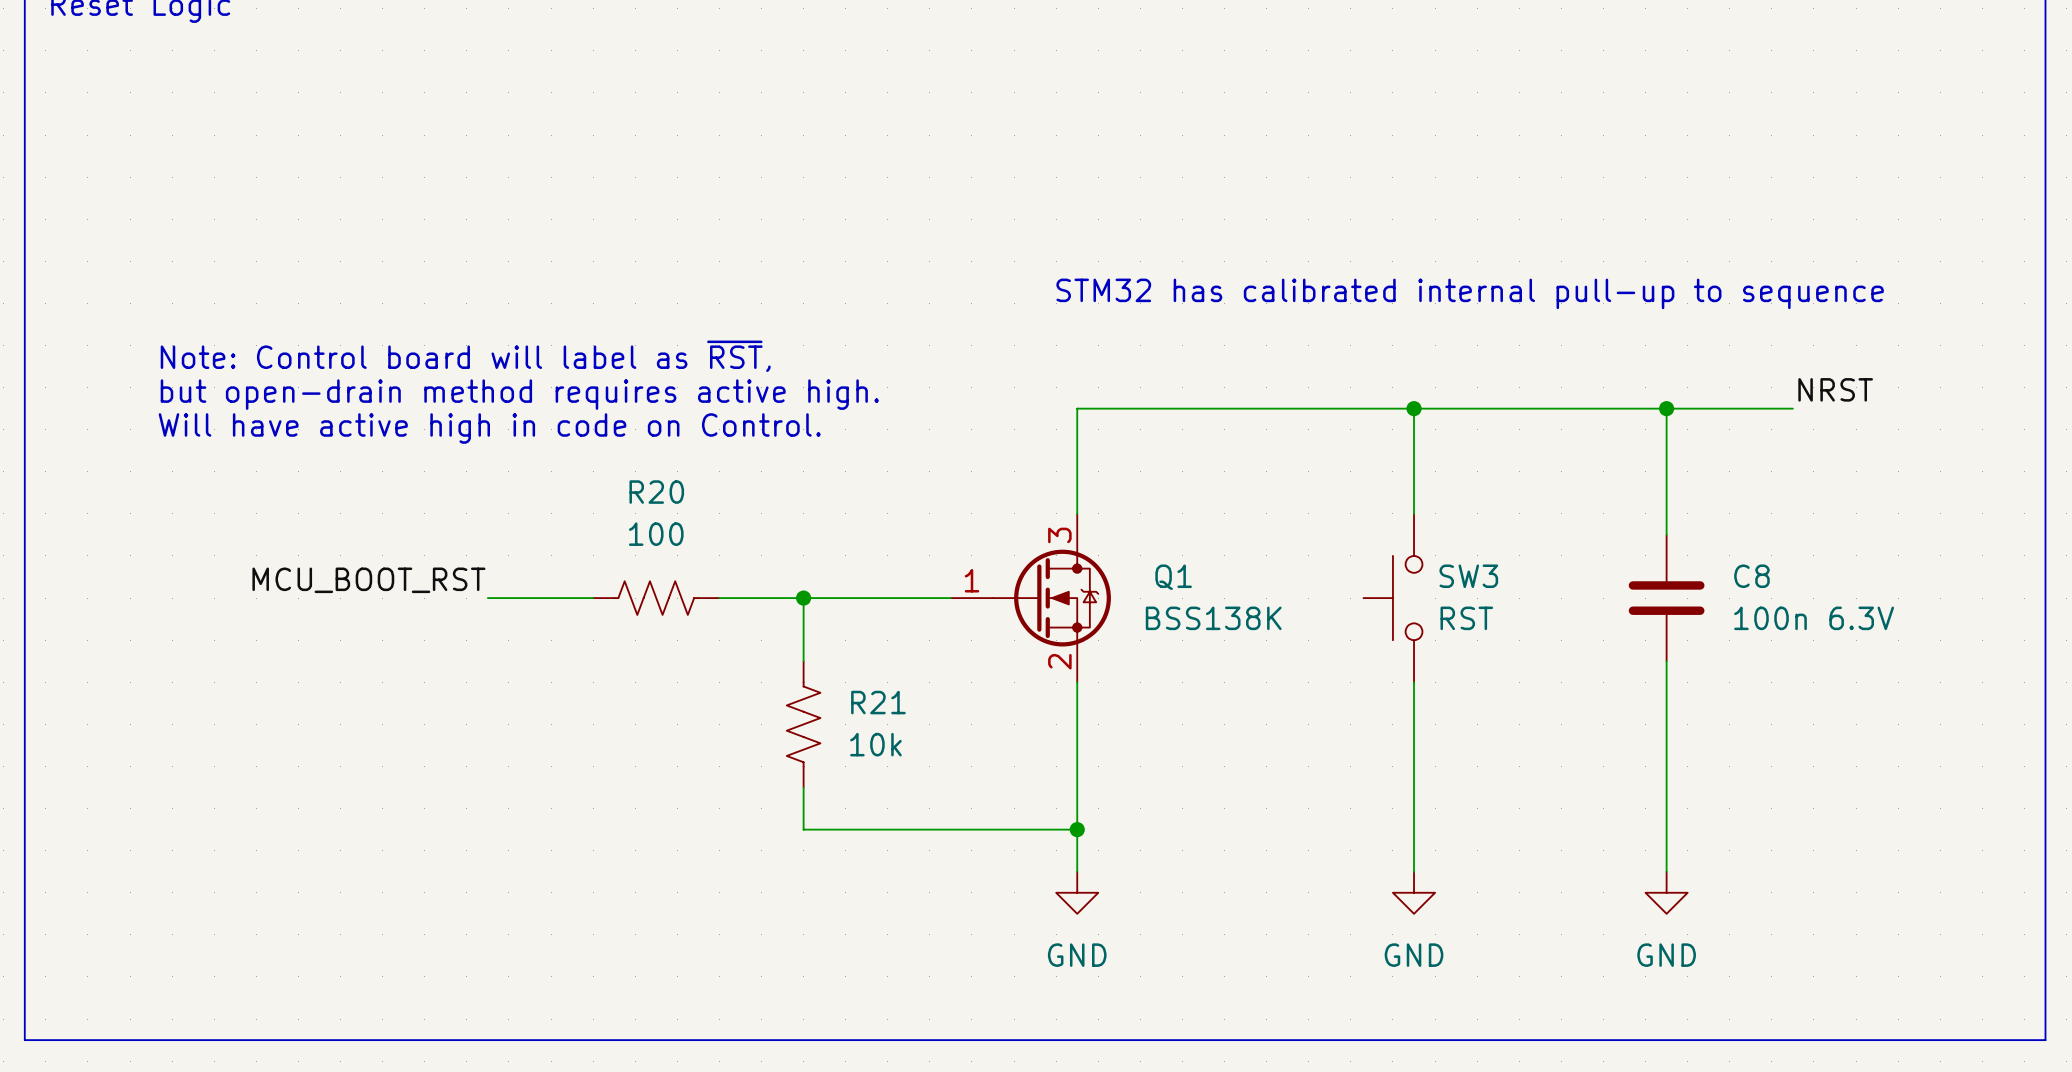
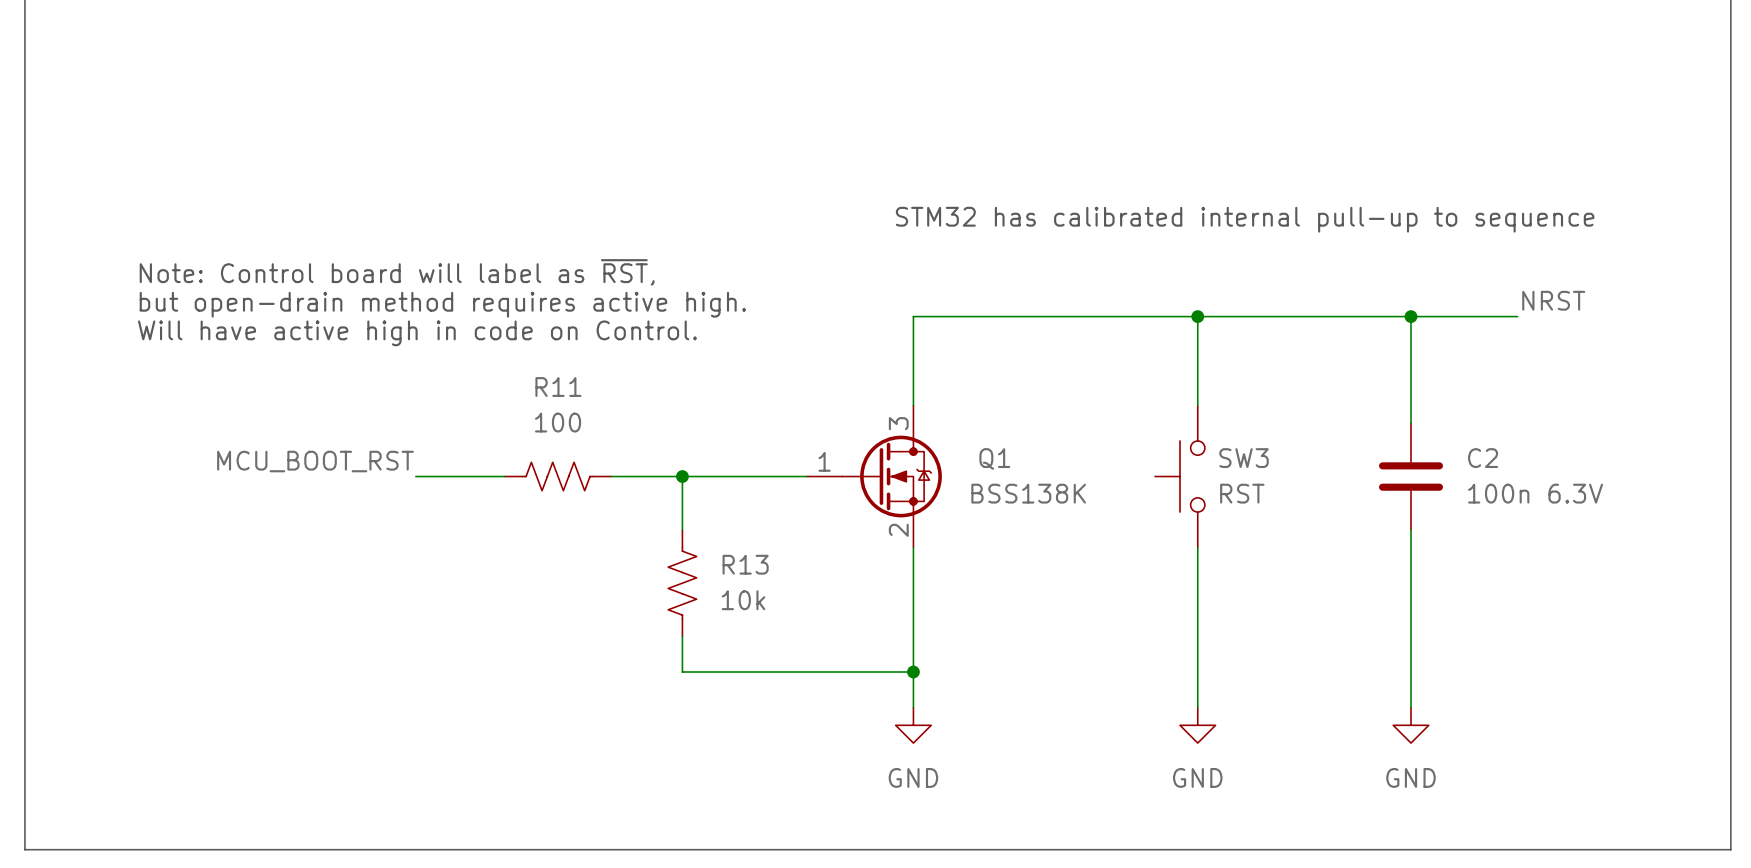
R20 name: R20 (656, 492) -> R11 (558, 387)
C8 name: C8 (1751, 576) -> C2 (1483, 458)
R21 name: R21 (878, 702) -> R13 (745, 564)

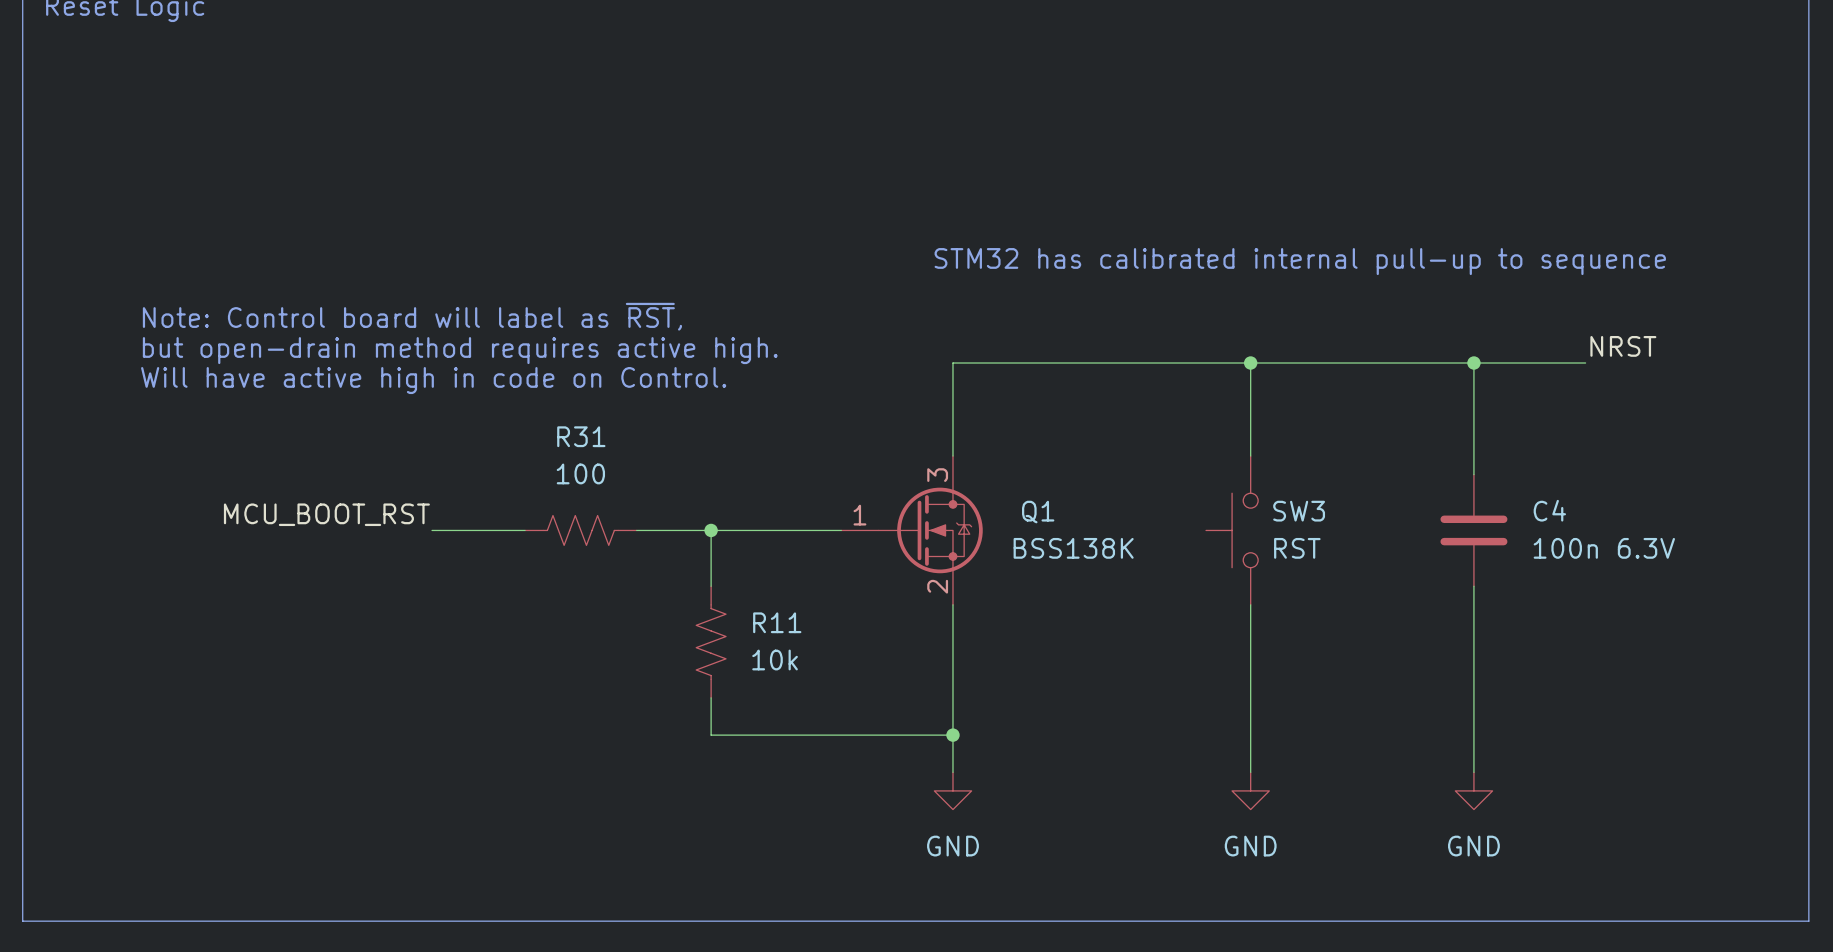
R11 name: R11 (558, 387) -> R31 (581, 436)
C2 name: C2 (1483, 458) -> C4 (1549, 510)
R13 name: R13 (745, 564) -> R11 (777, 622)

